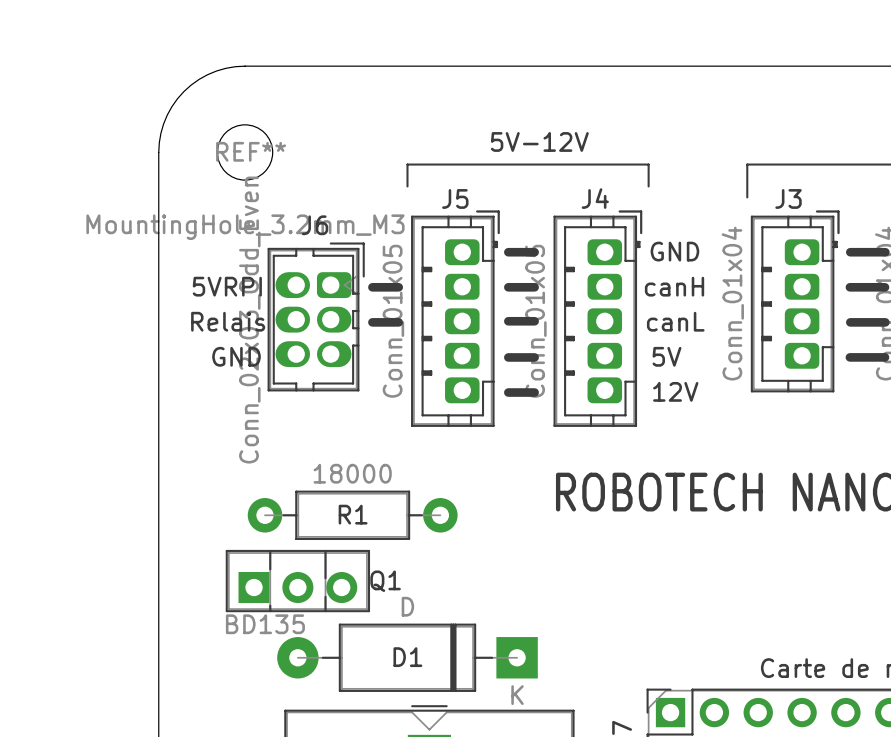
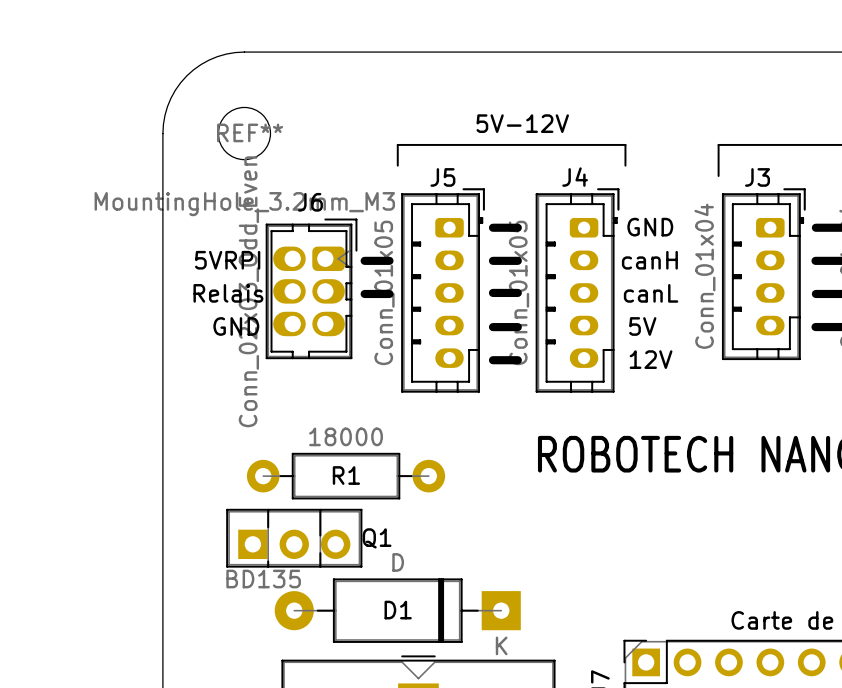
J5 footprint: [411, 210, 500, 427] -> [401, 188, 485, 393]
J4 footprint: [553, 210, 643, 427] -> [535, 188, 620, 393]
J3 footprint: [750, 210, 840, 393] -> [721, 188, 806, 361]

